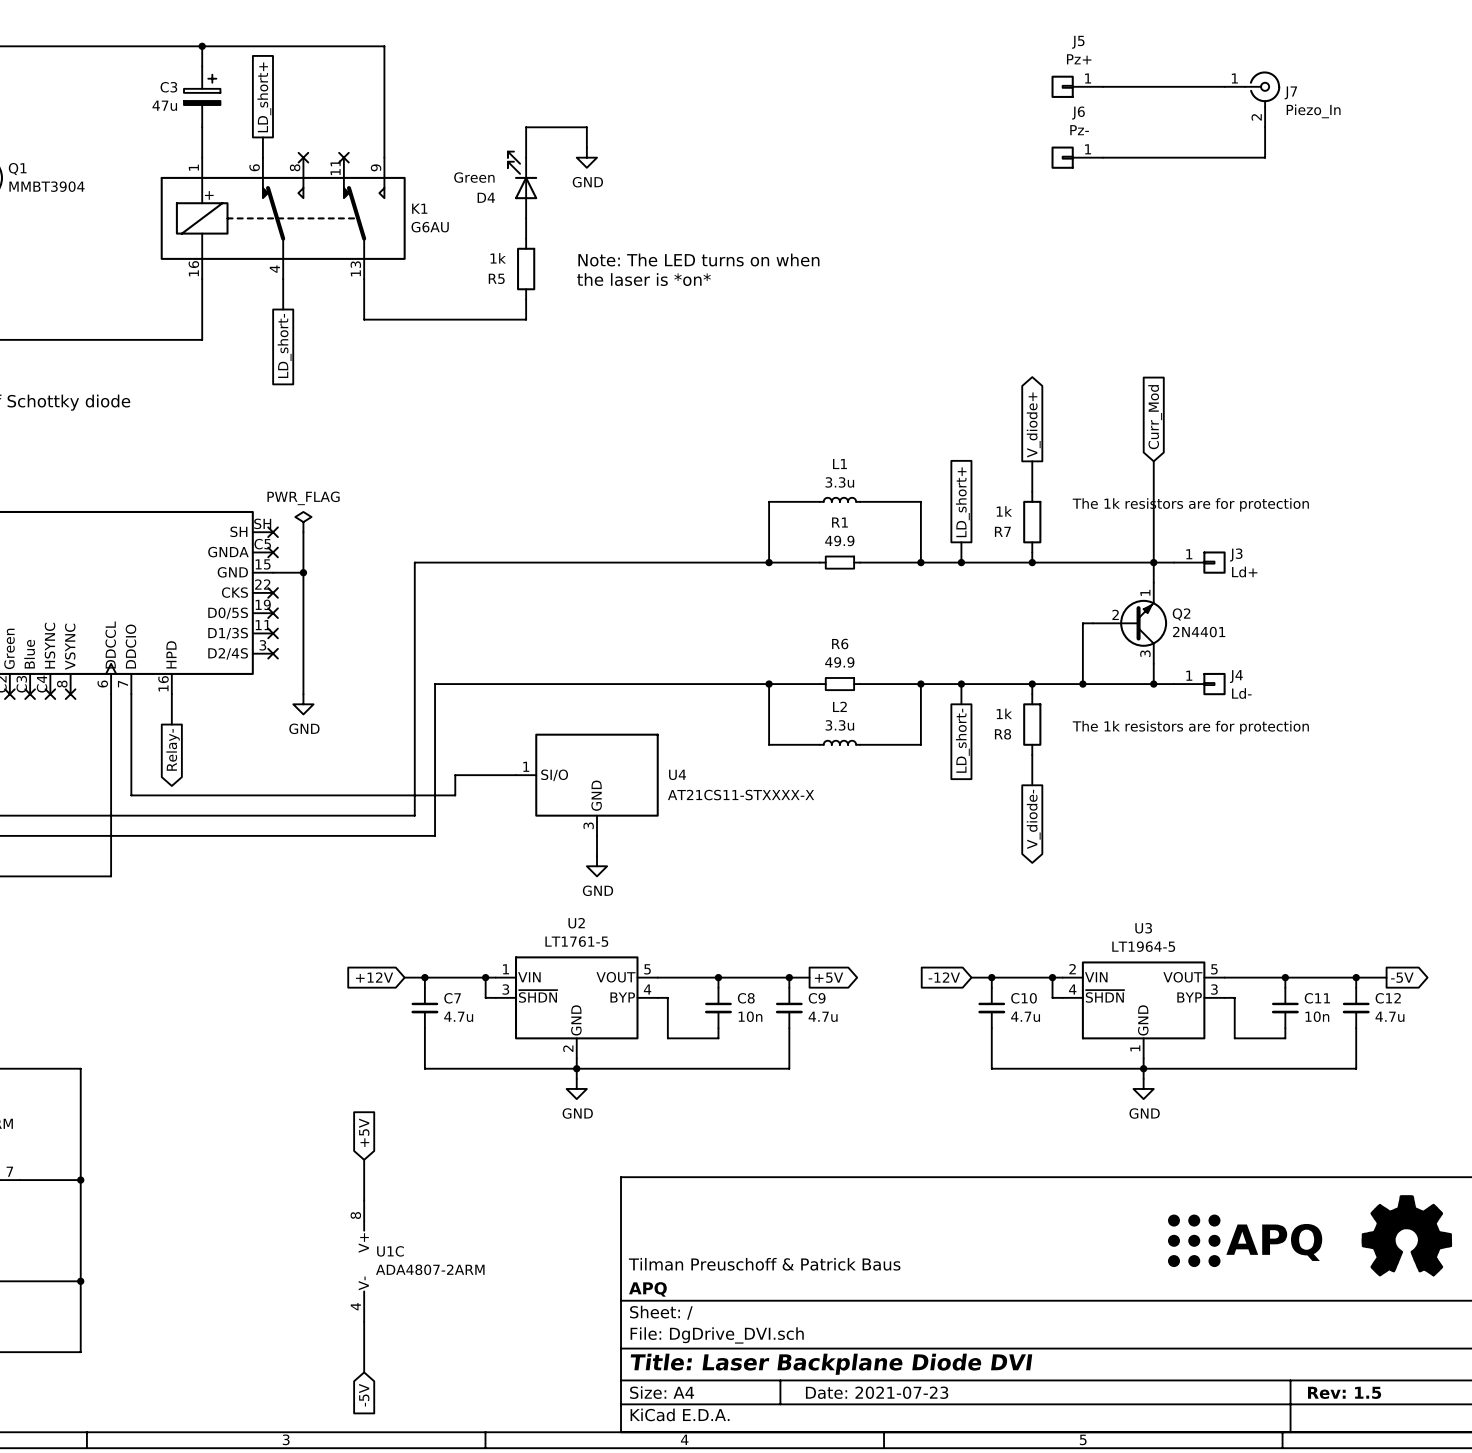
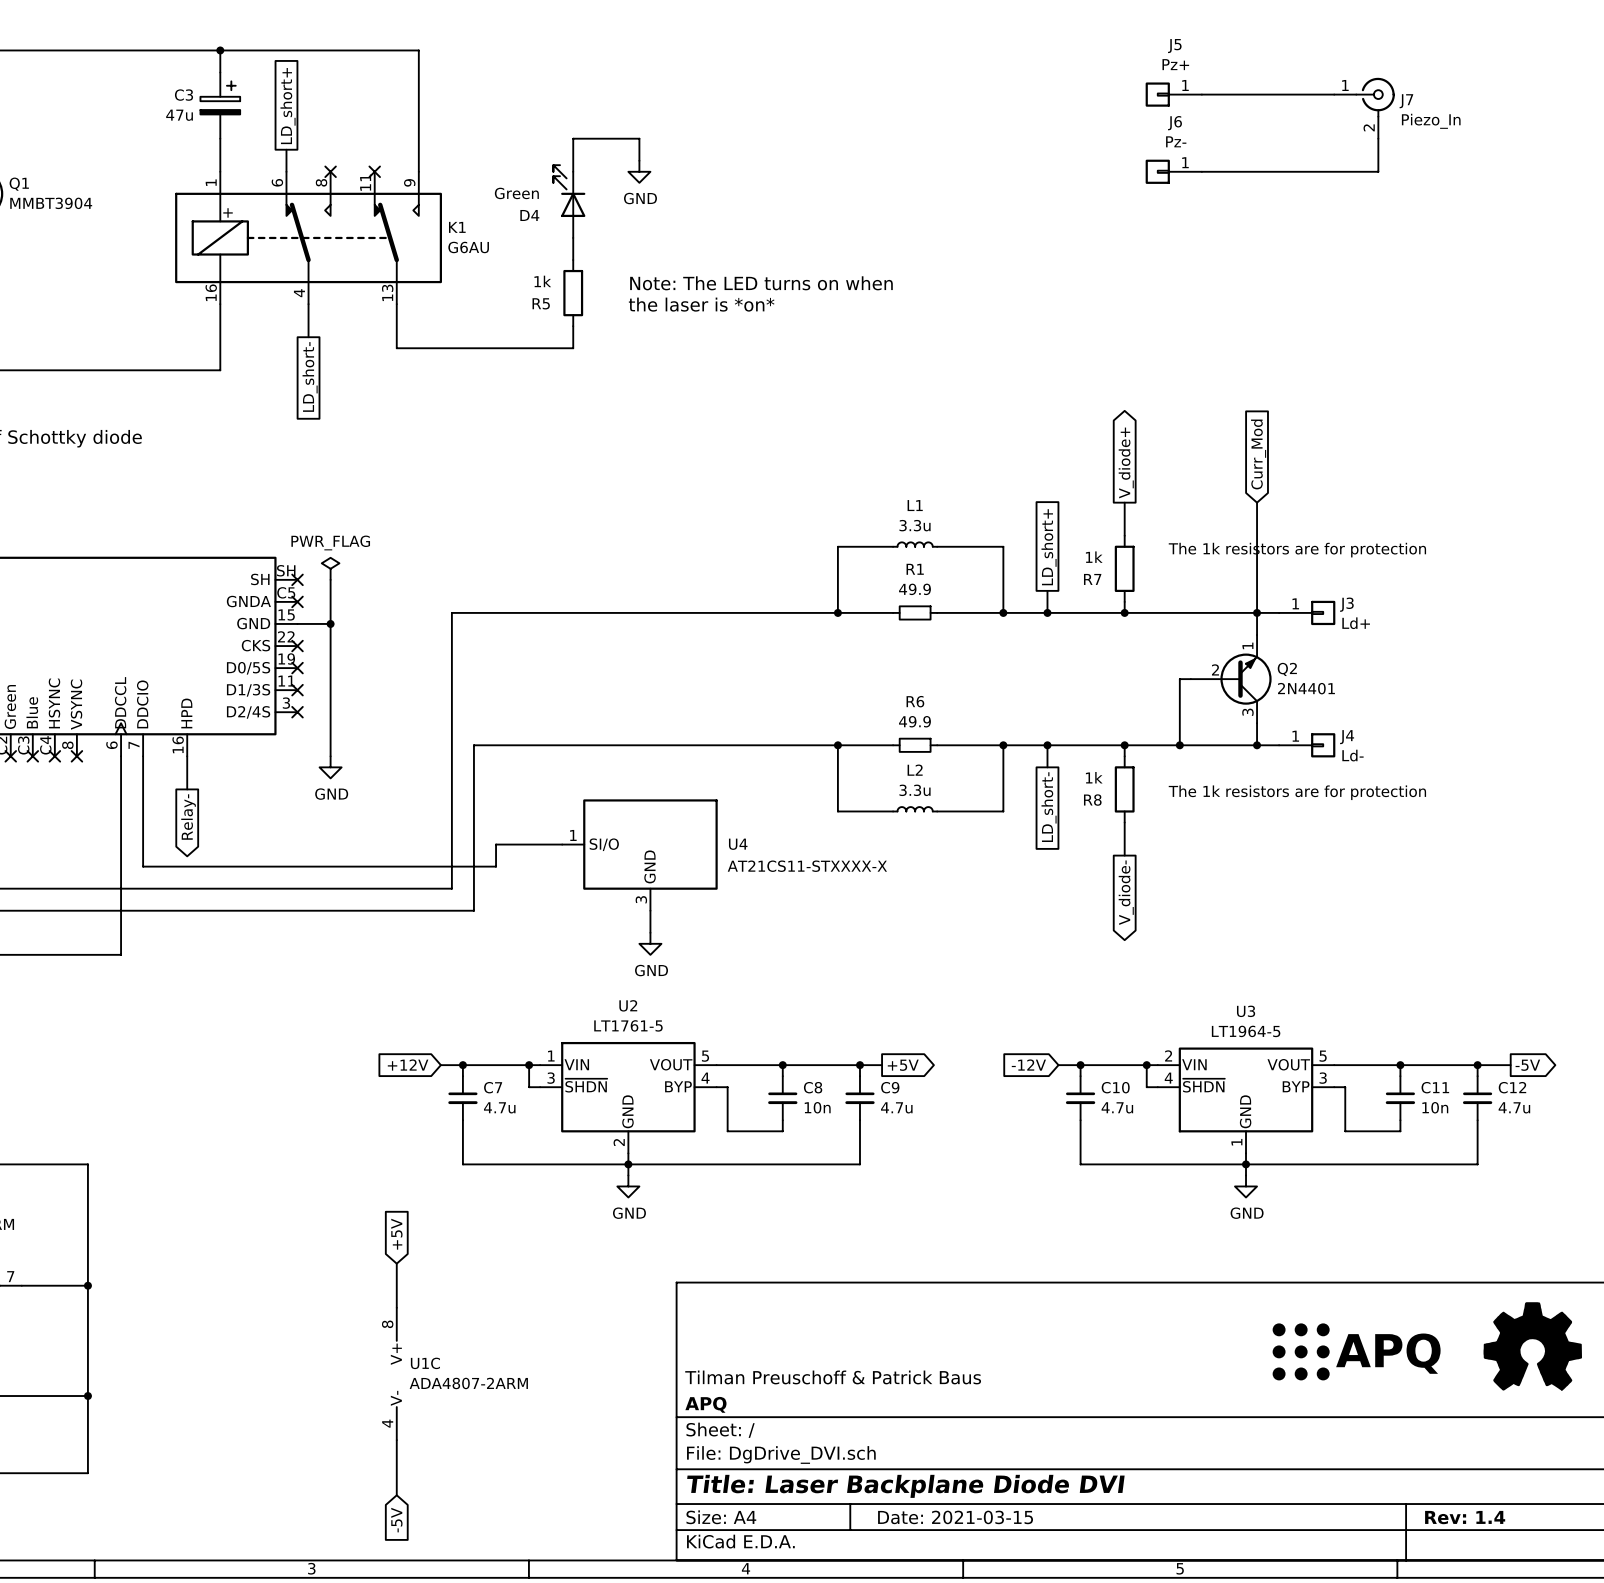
title block: Date: 2021-07-23 (877, 1392) -> Date: 2021-03-15 (955, 1517)
title block: Rev: 1.5 (1344, 1392) -> Rev: 1.4 (1465, 1517)

